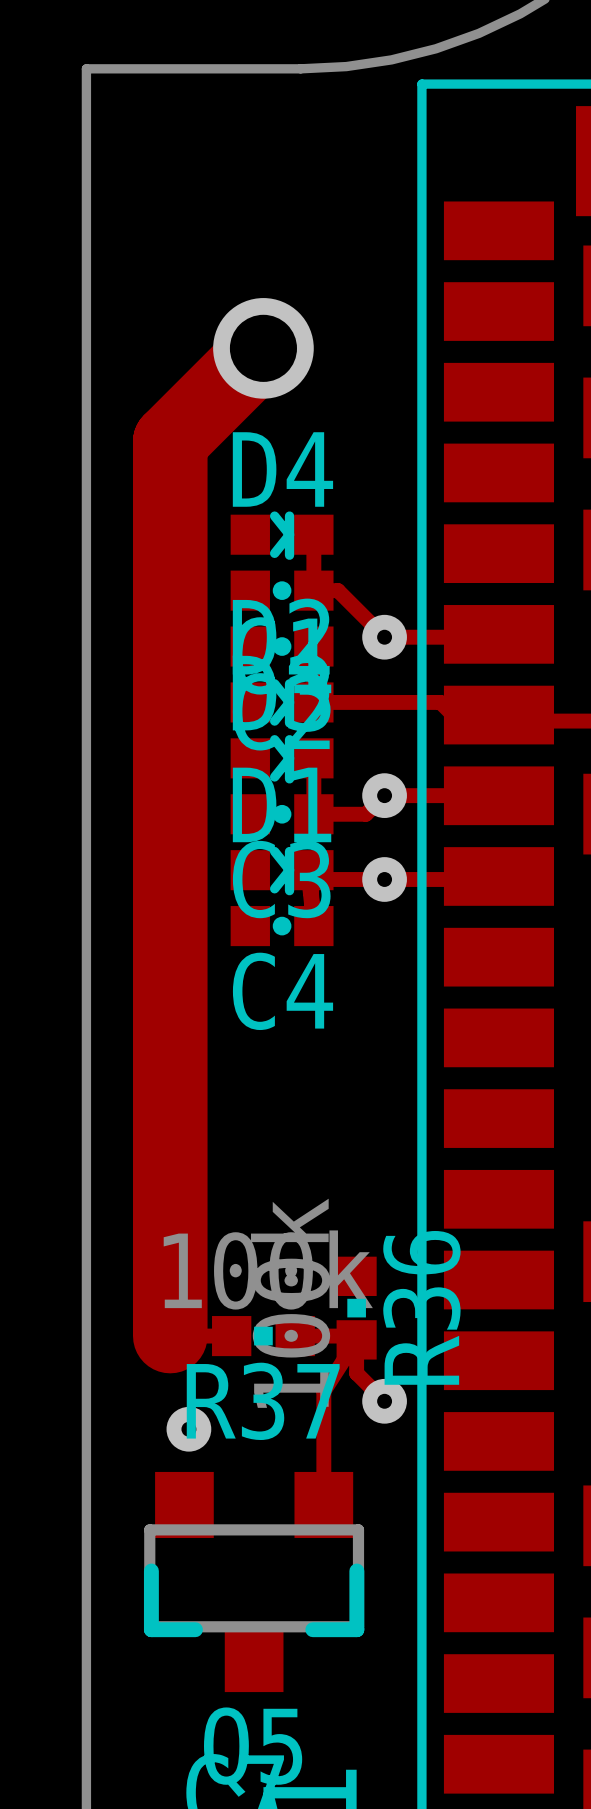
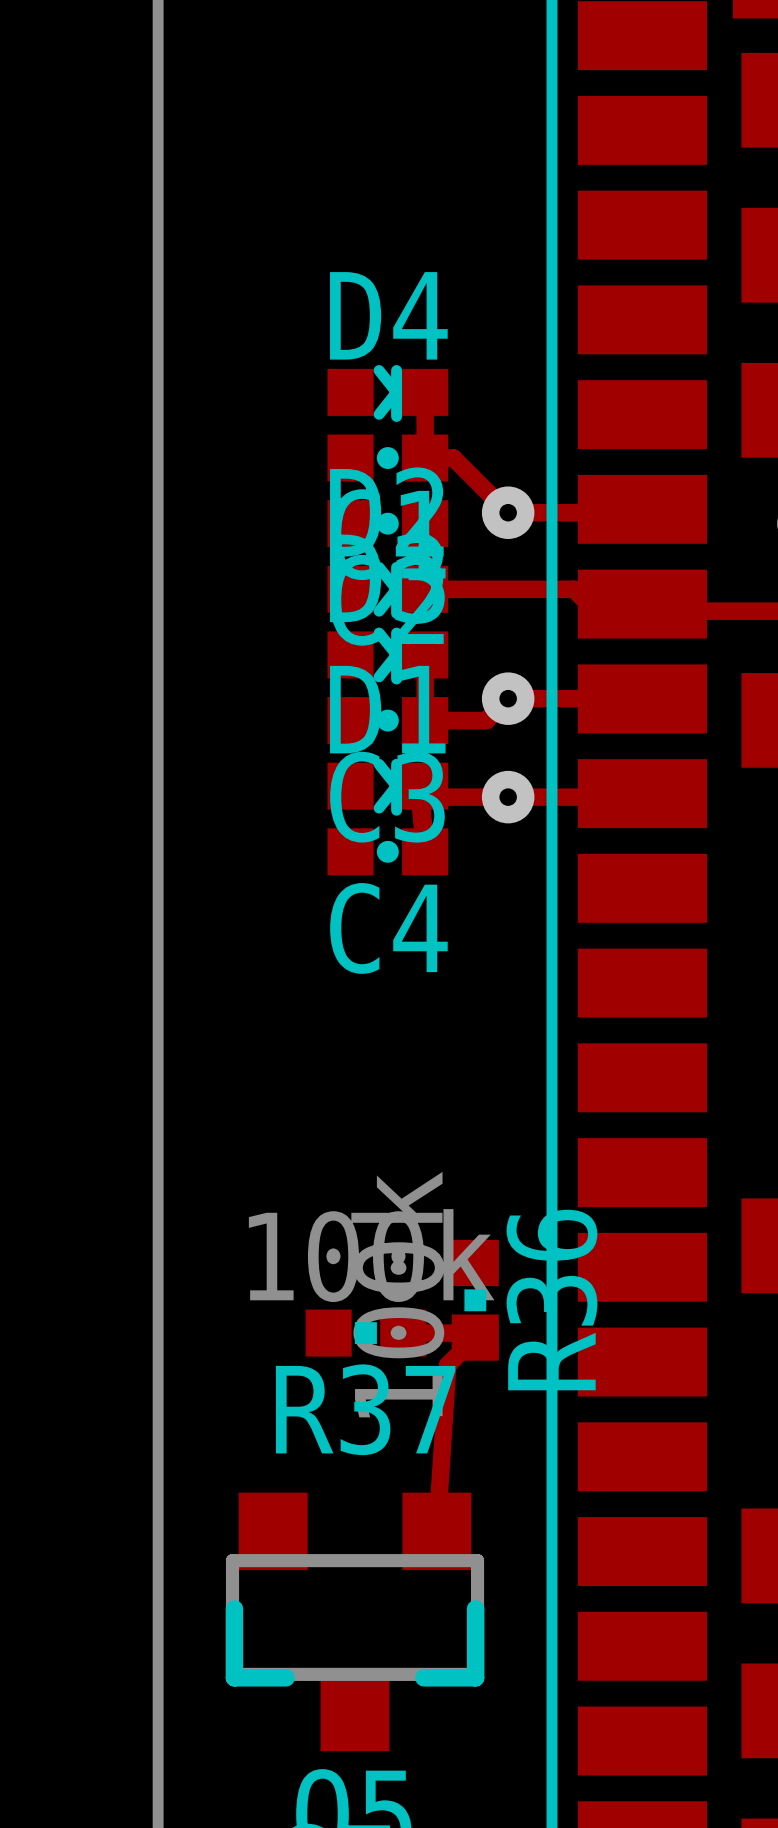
track: (263, 348) (170, 441) (170, 1336) (231, 1336) -> none
via: (263, 348) -> none
track: (384, 1401) (356, 1373) (356, 1339) (323, 1391) (323, 1504) -> (475, 1337) (447, 1365) (436, 1531)
via: (384, 1401) -> none
via: (188, 1429) -> none

